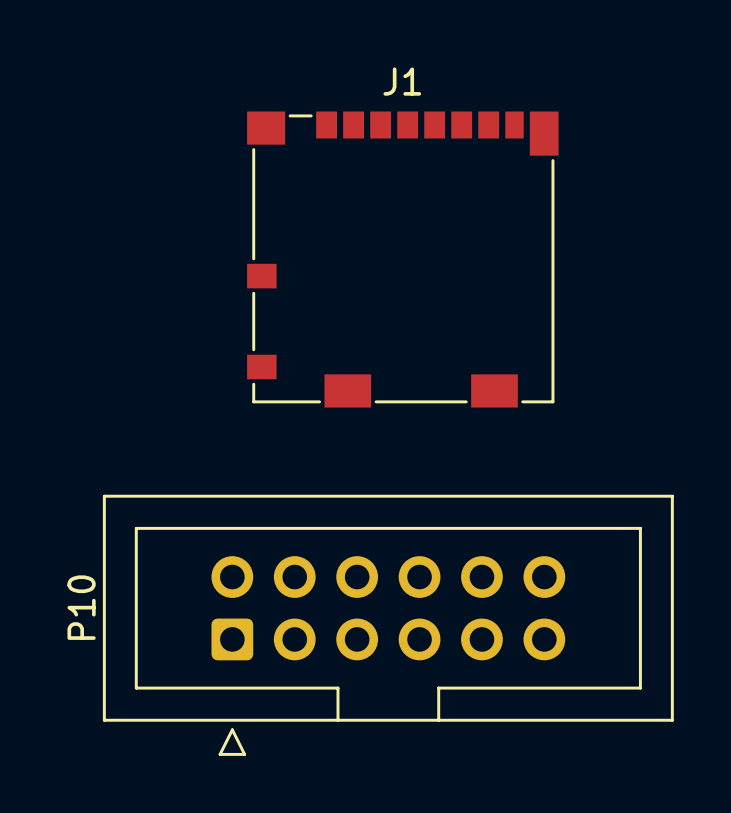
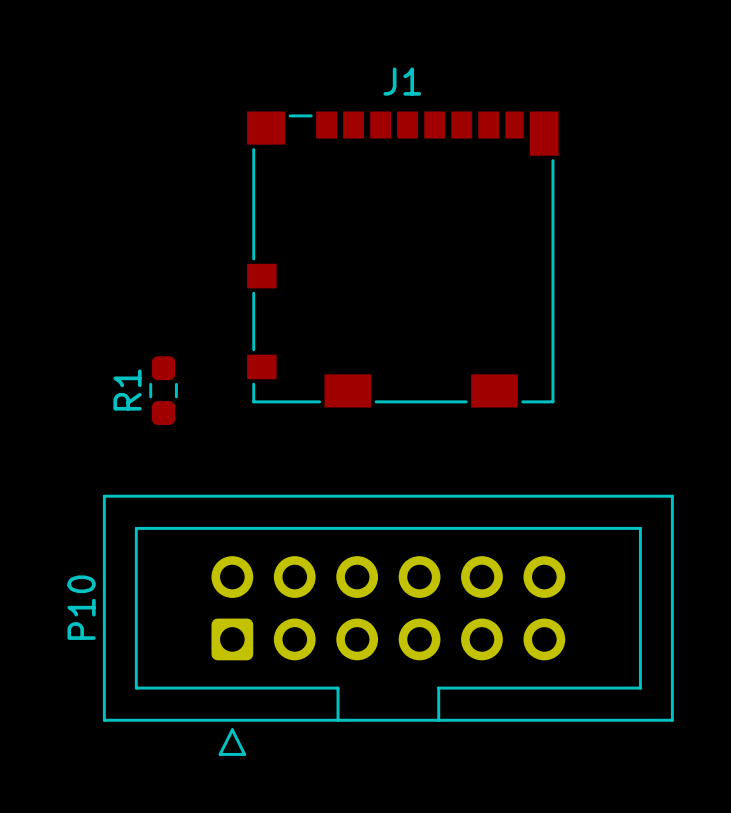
R1: none -> (163, 390)

